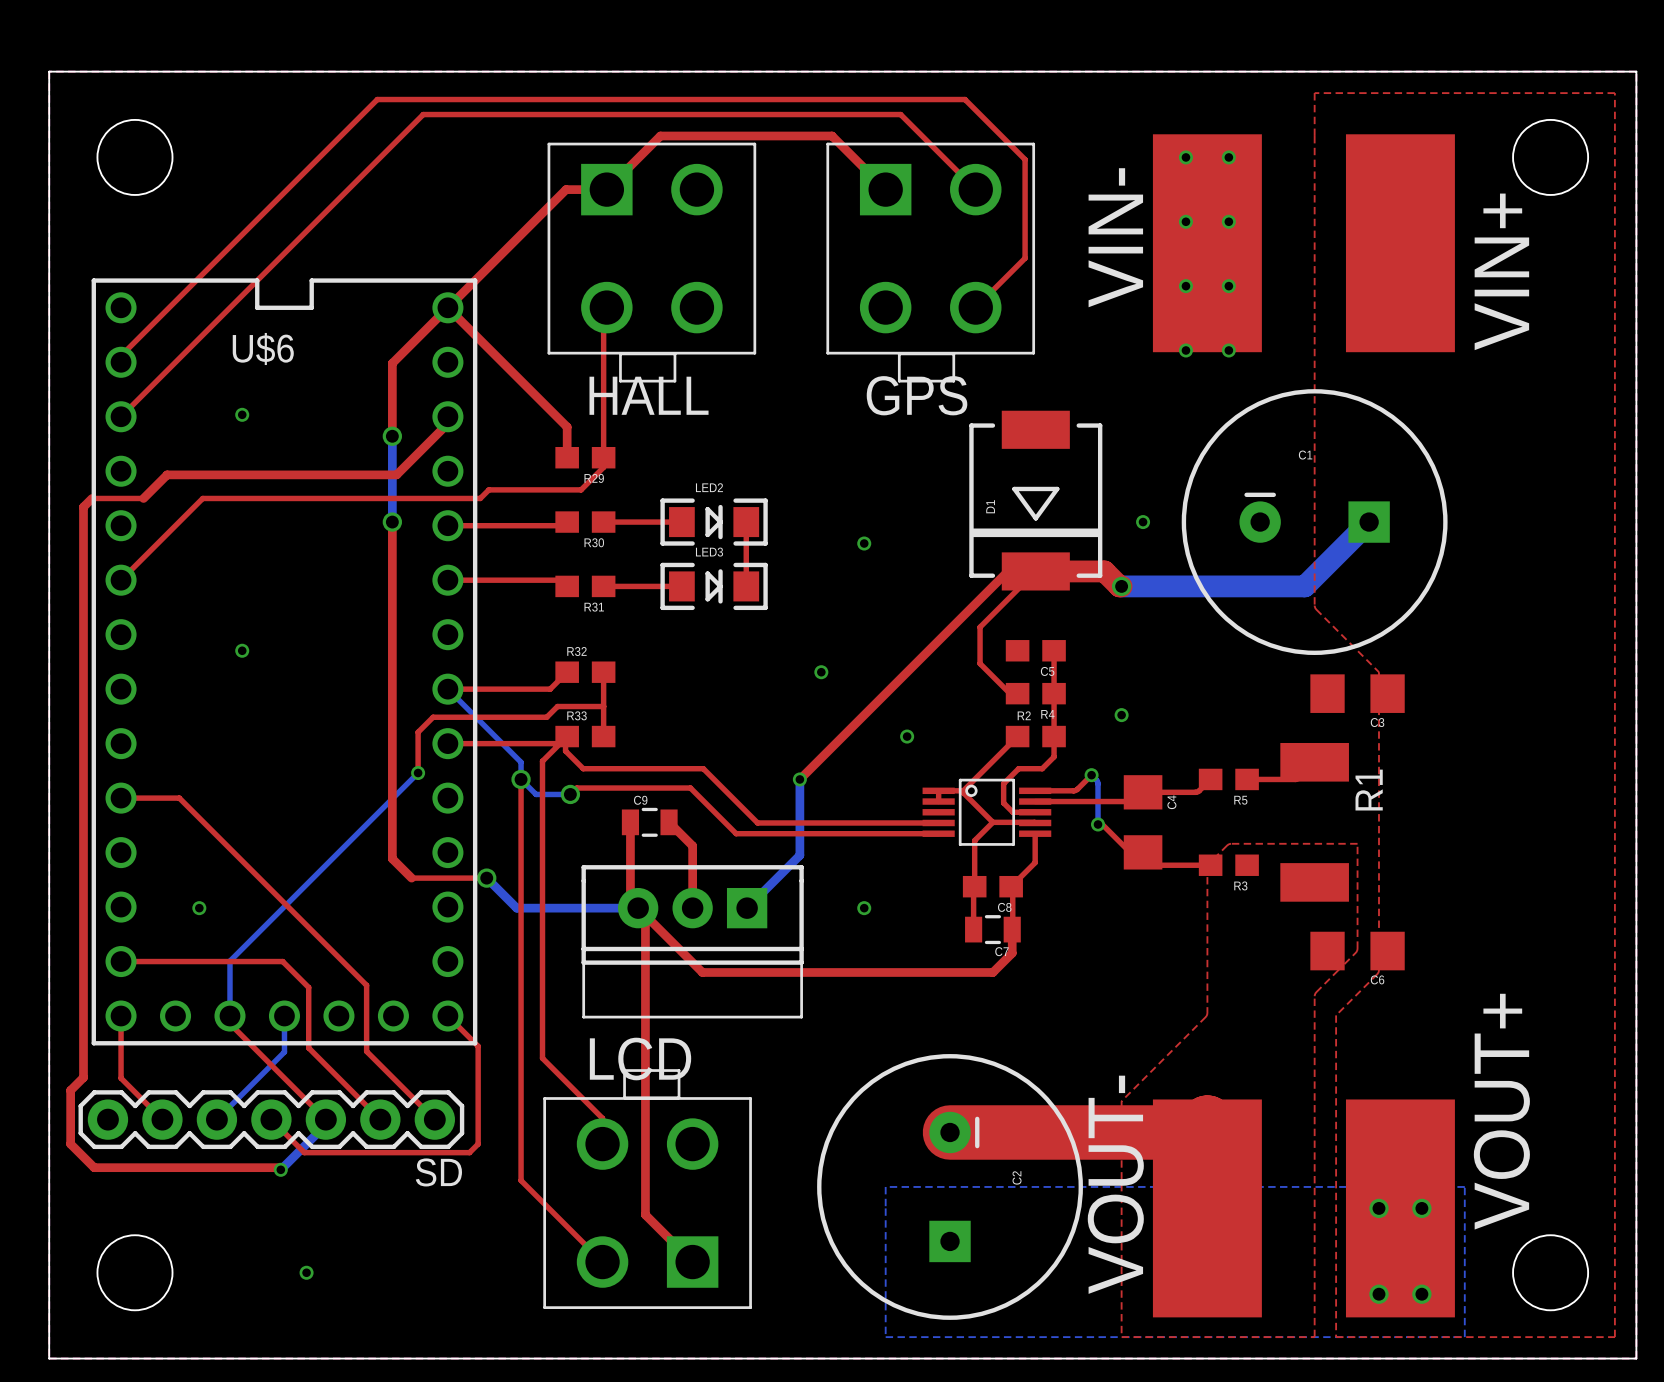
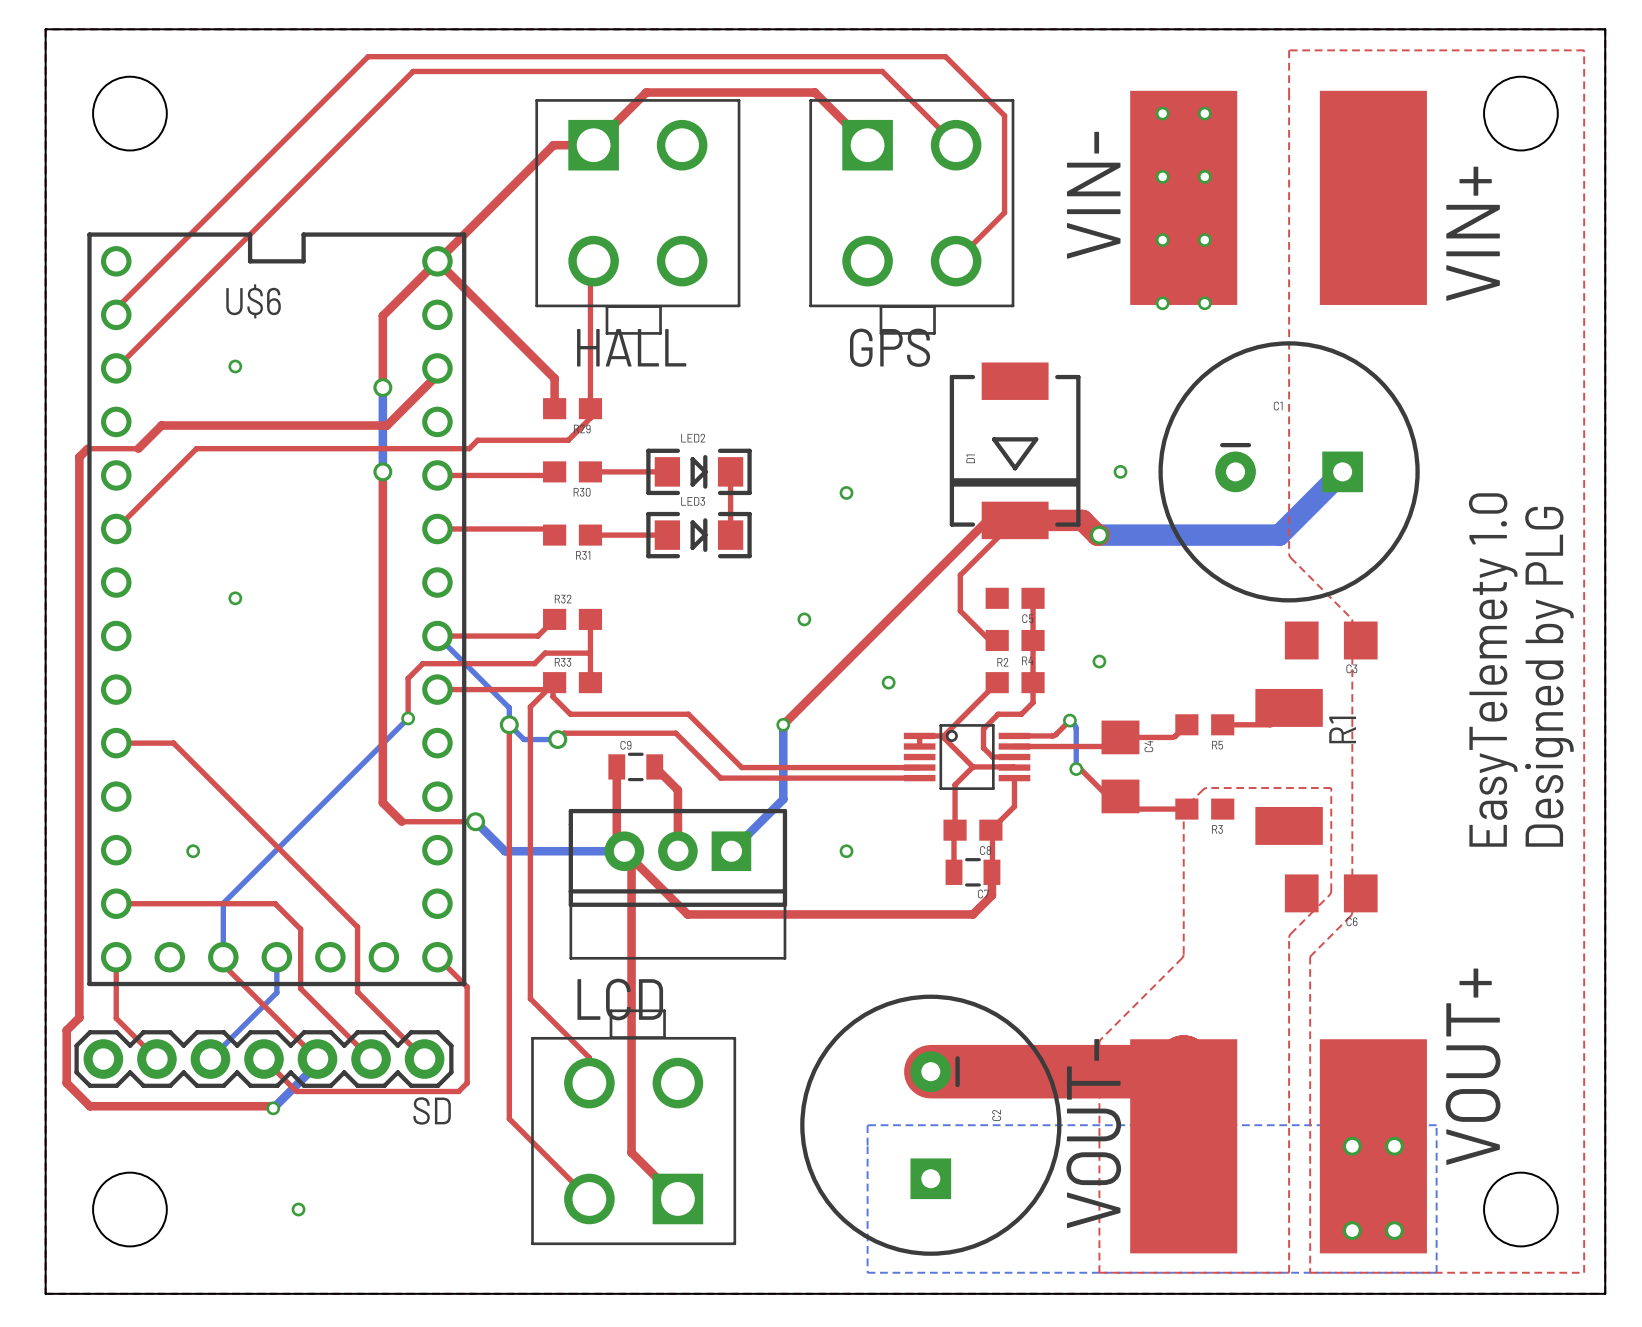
text: none -> EasyTelemety 1.0 (1493, 669)
text: none -> Designed by PLG (1549, 676)

